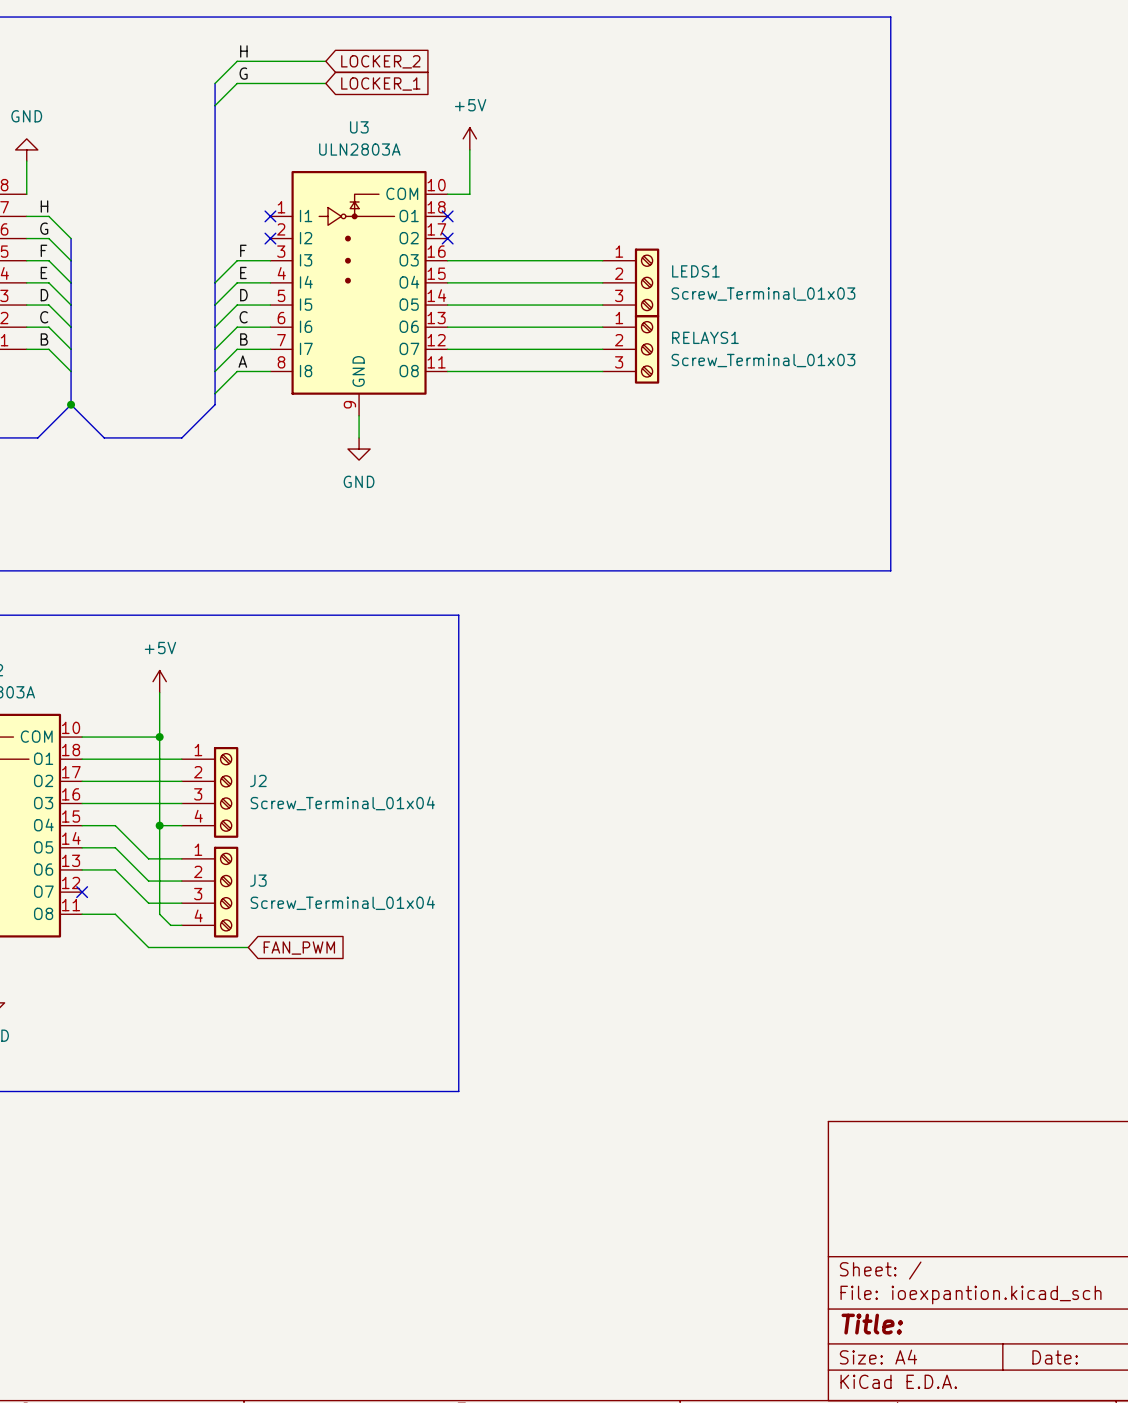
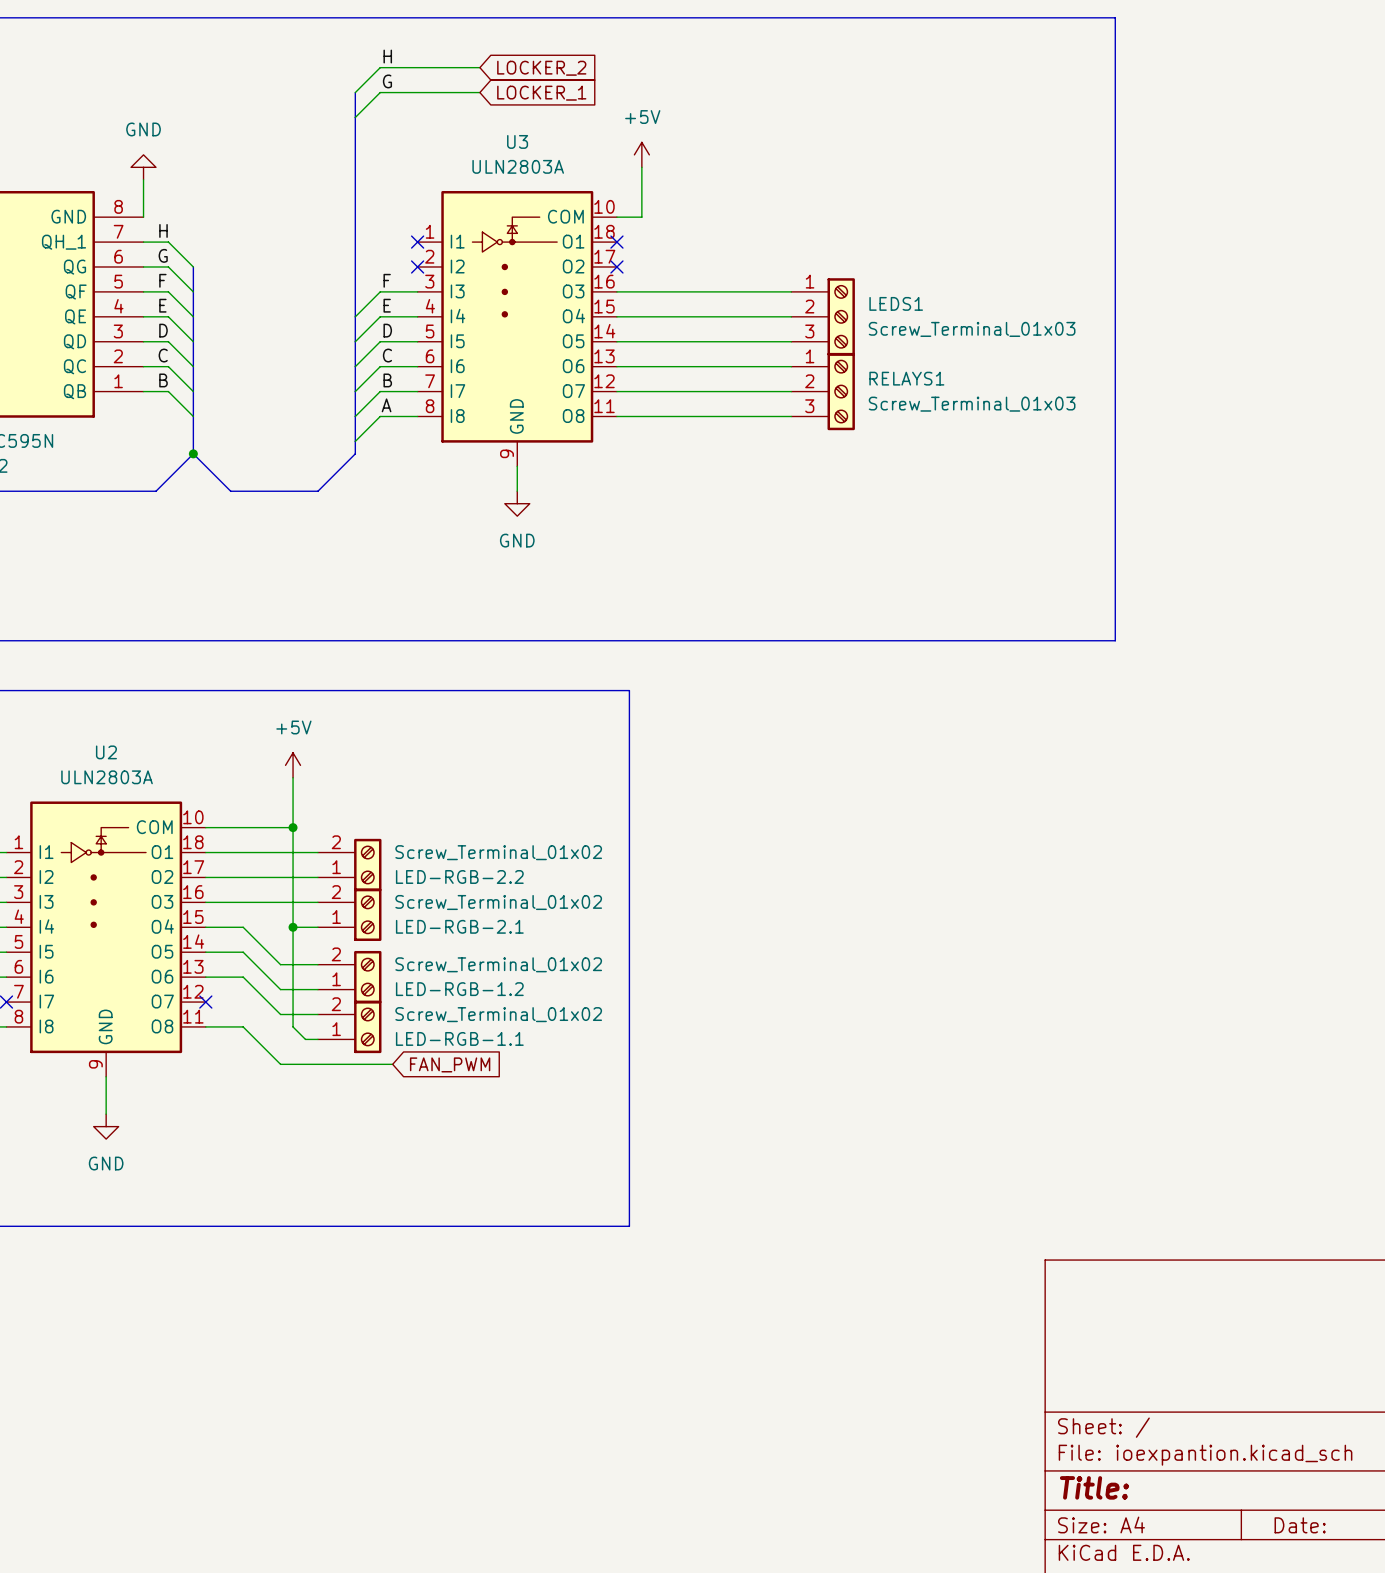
LED-RGB-2.2: none -> Screw_Terminal_01x02 (349, 865)
J2: Screw_Terminal_01x04 (210, 792) -> none
LED-RGB-2.1: none -> Screw_Terminal_01x02 (349, 914)
LED-RGB-1.2: none -> Screw_Terminal_01x02 (349, 977)
J3: Screw_Terminal_01x04 (210, 892) -> none
LED-RGB-1.1: none -> Screw_Terminal_01x02 (349, 1026)

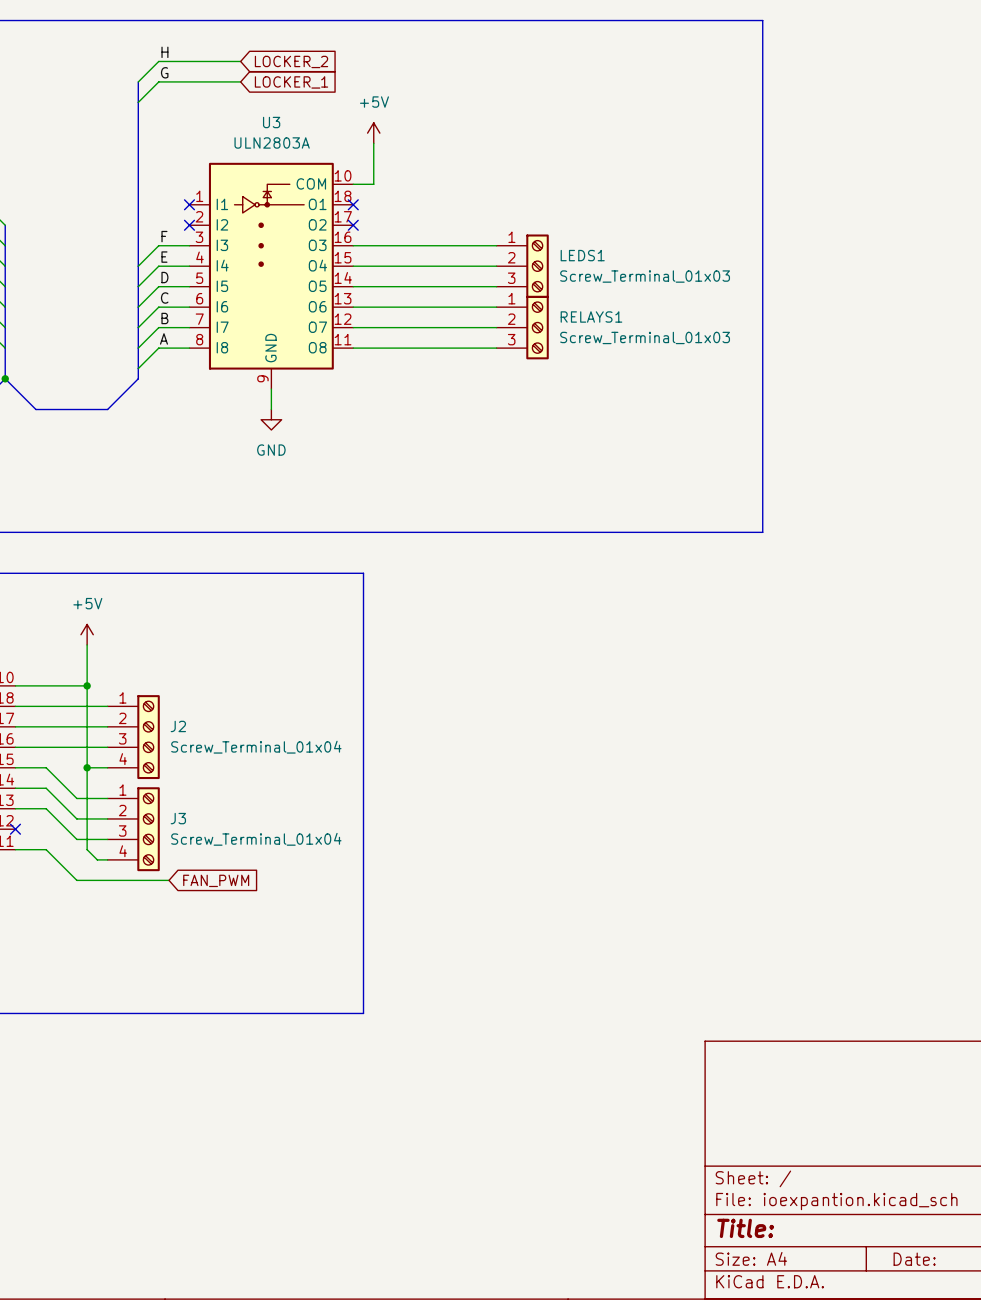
LED-RGB-2.2: Screw_Terminal_01x02 (349, 865) -> none
J2: none -> Screw_Terminal_01x04 (133, 737)
LED-RGB-2.1: Screw_Terminal_01x02 (349, 914) -> none
LED-RGB-1.2: Screw_Terminal_01x02 (349, 977) -> none
J3: none -> Screw_Terminal_01x04 (133, 829)
LED-RGB-1.1: Screw_Terminal_01x02 (349, 1026) -> none

